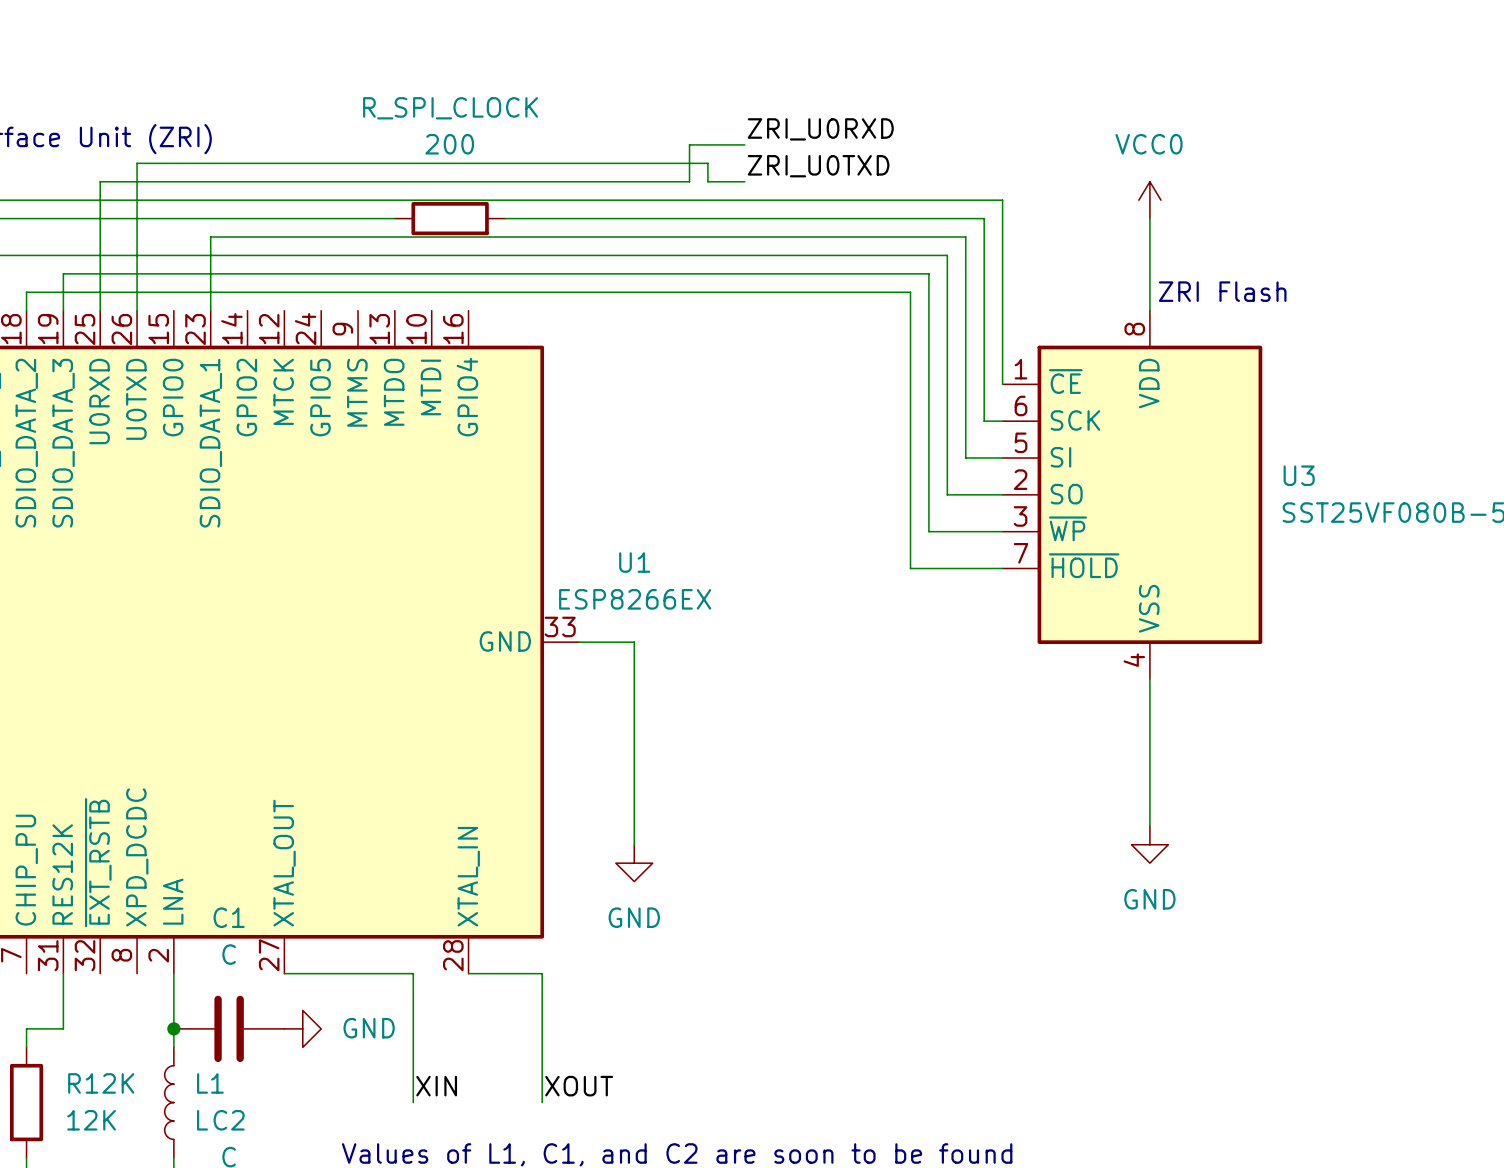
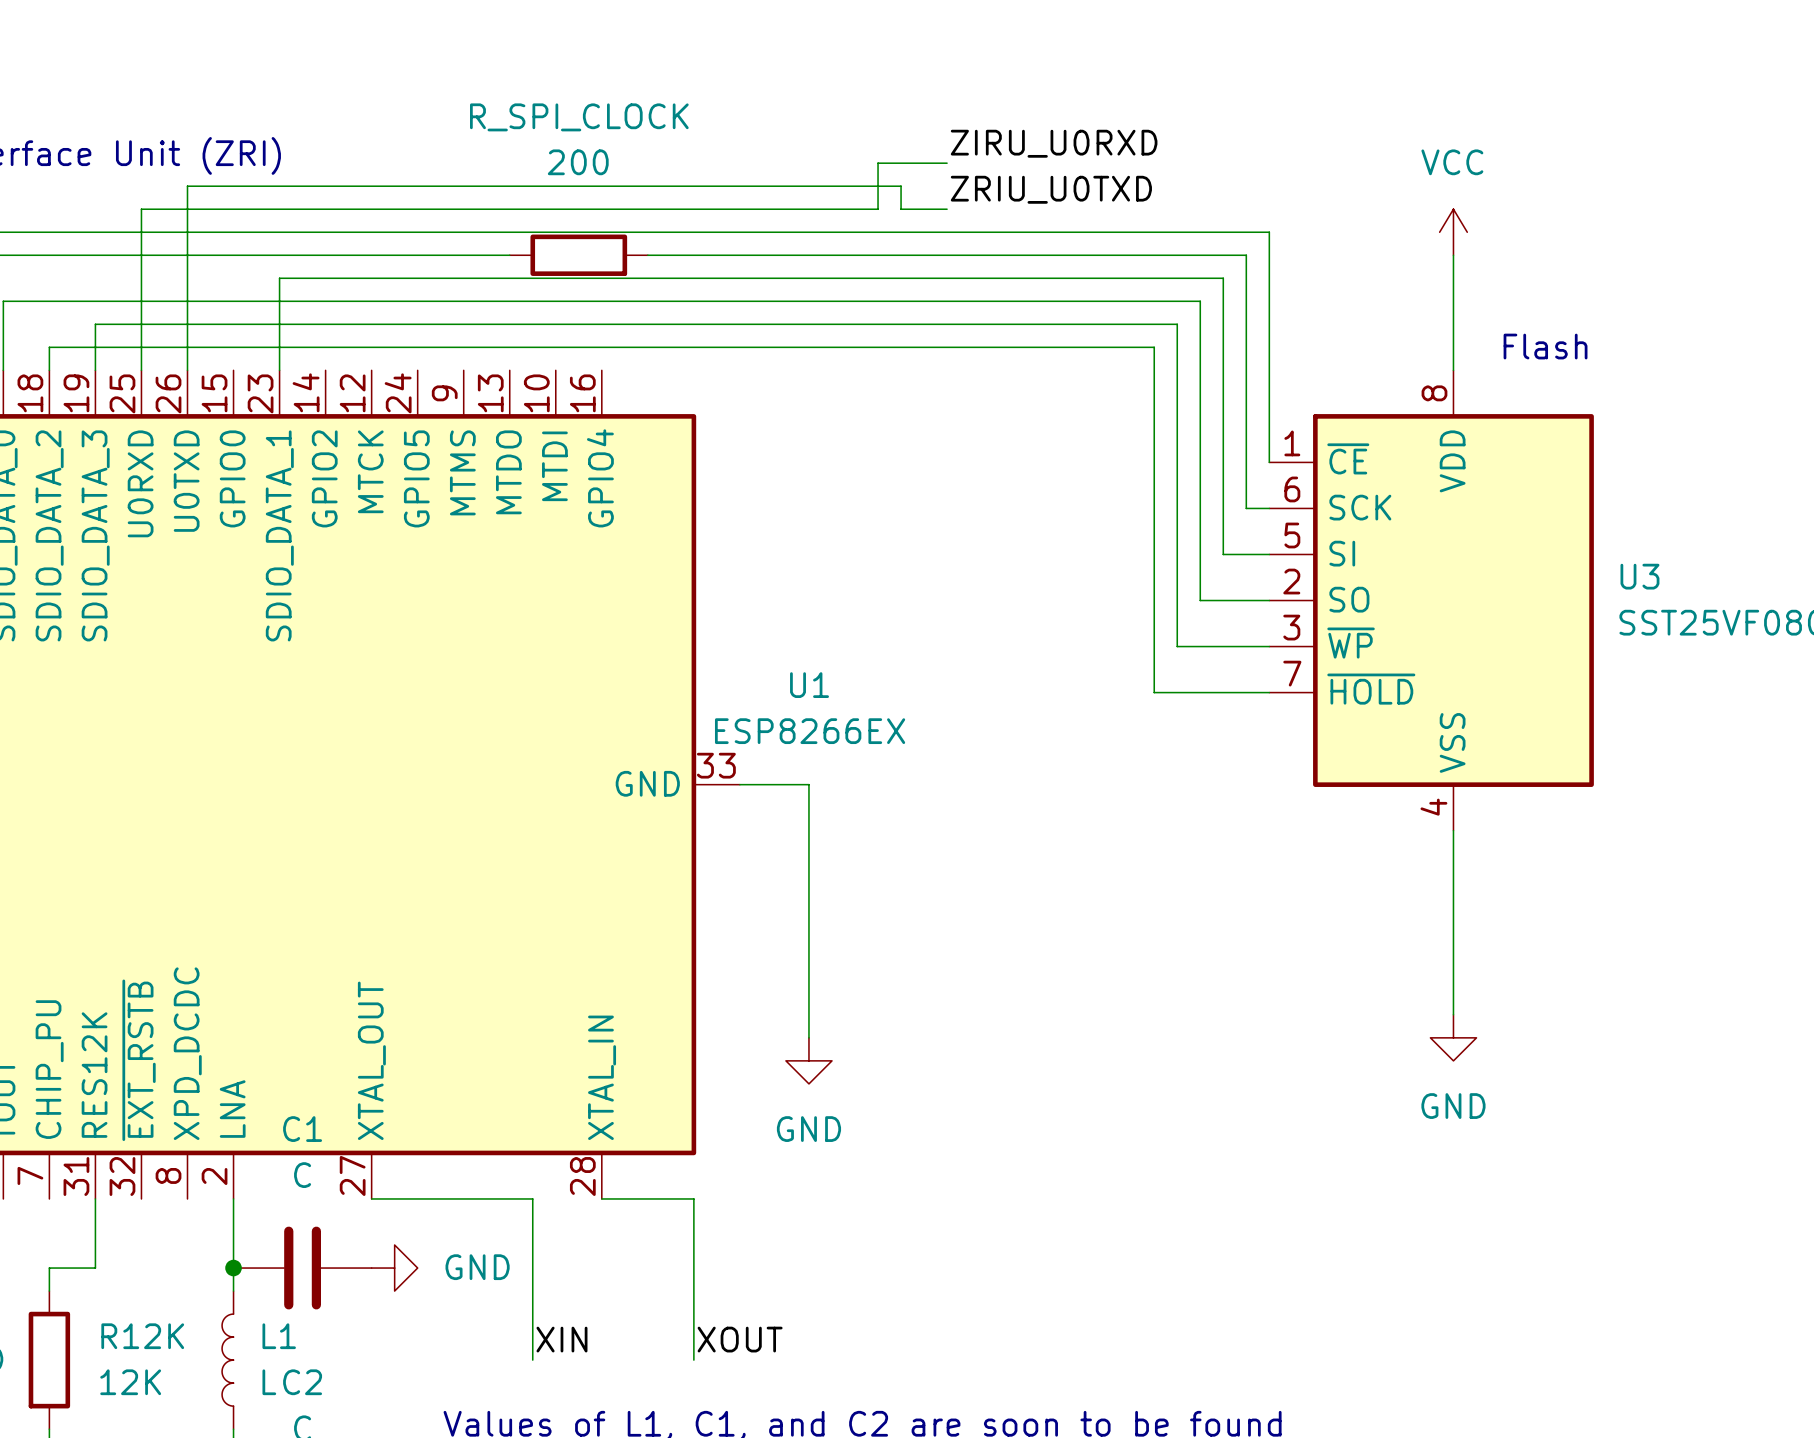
label: ZRI_U0RXD (820, 129) -> ZIRU_U0RXD (1054, 143)
label: ZRI_U0TXD (818, 166) -> ZRIU_U0TXD (1051, 189)
power symbol: VCC0 (1149, 200) -> VCC (1453, 232)
text: ZRI Flash (1222, 291) -> Flash (1545, 346)

